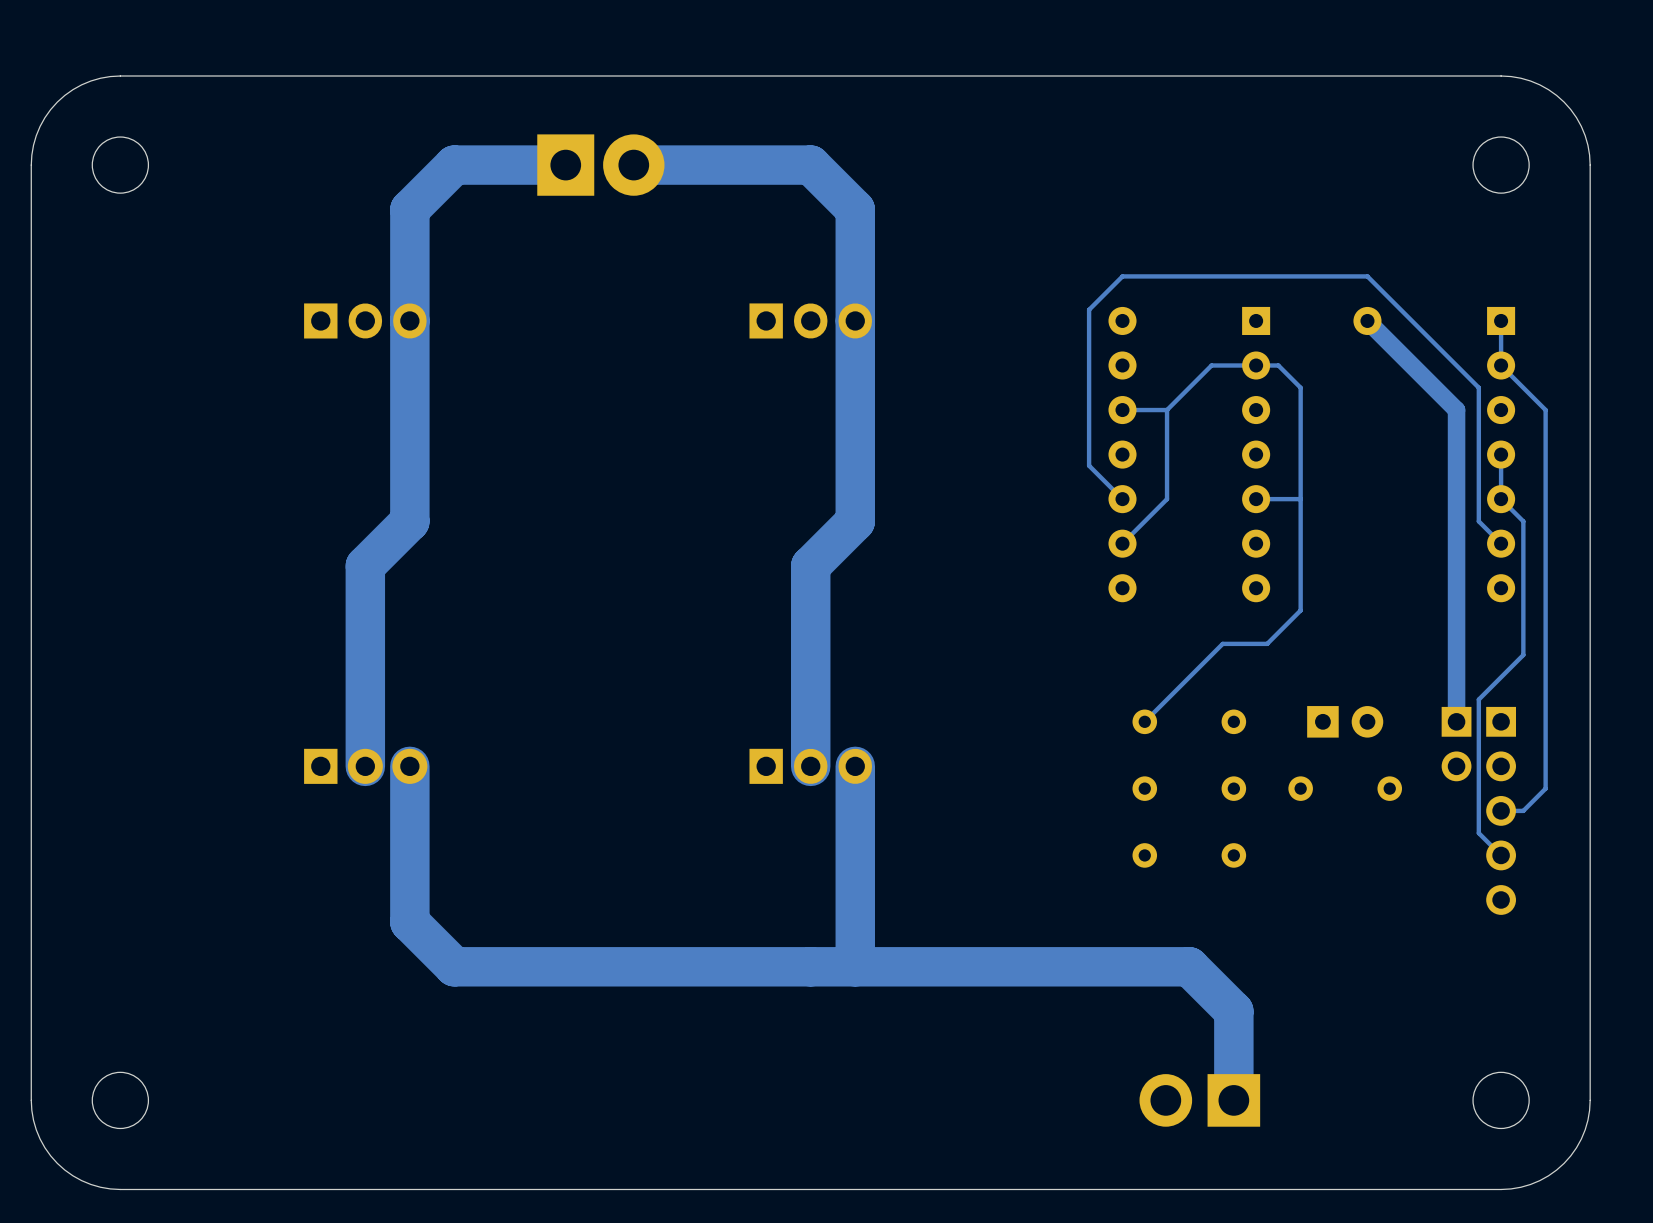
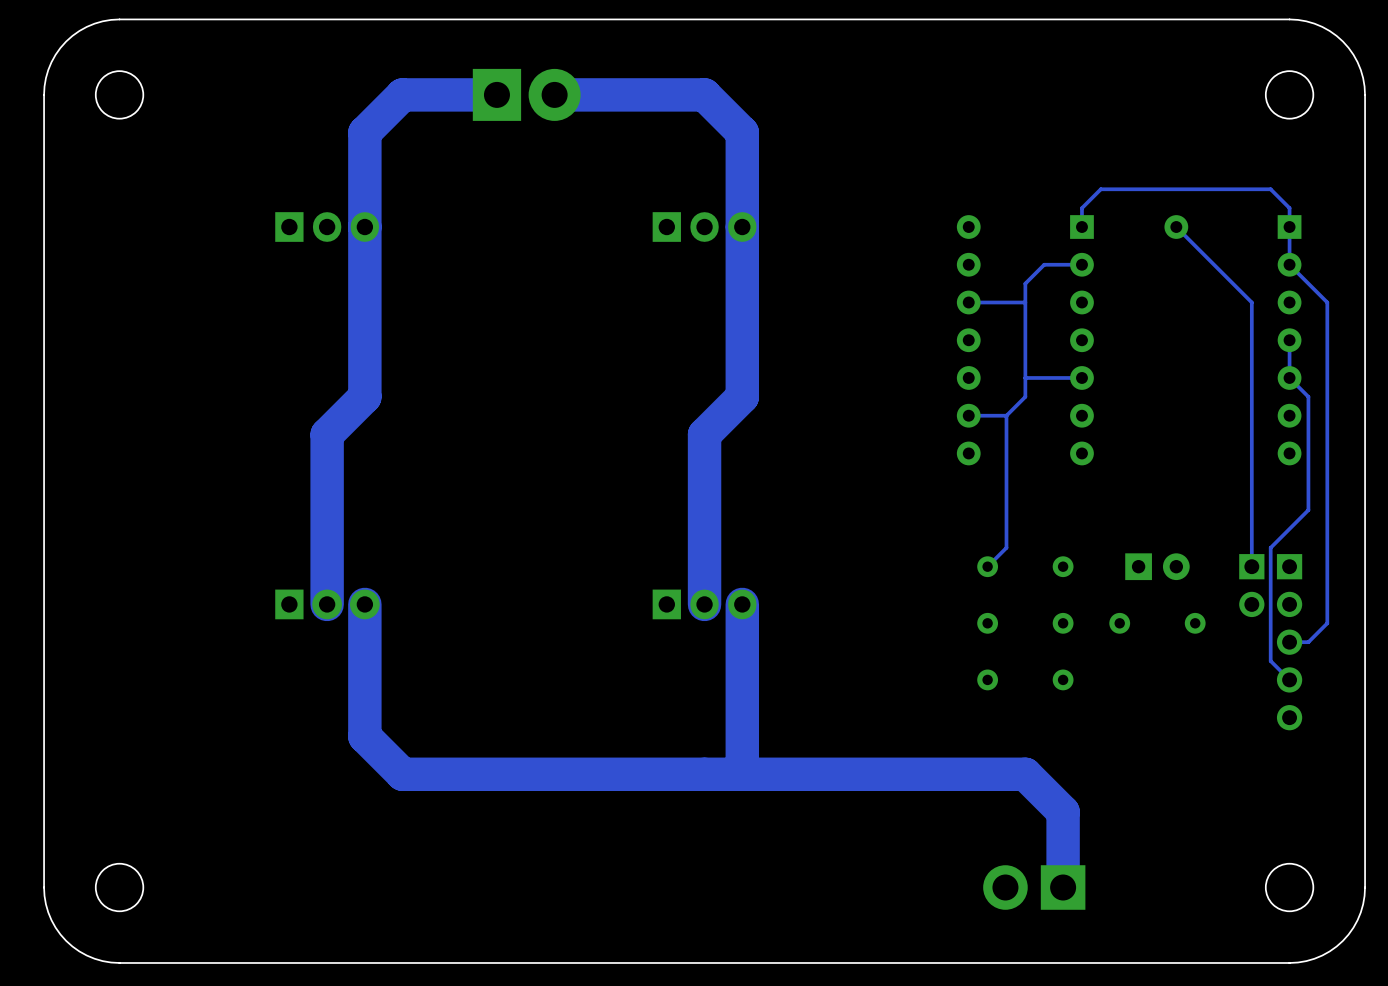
track: (1278, 276) (1122, 276) (1089, 309) (1089, 465) (1122, 499) -> (1100, 189) (1081, 208) (1081, 227)
track: (1367, 276) (1478, 387) (1478, 521) (1501, 543) -> (1176, 189) (1270, 189) (1289, 208) (1289, 227)
track width: thick (1367, 320) (1456, 410) (1456, 721) -> thin (1176, 227) (1251, 302) (1251, 566)
track: (1256, 365) (1278, 365) (1300, 387) (1300, 610) (1267, 643) (1222, 643) (1167, 699) -> (1006, 415) (1006, 547)
track: (1189, 387) (1167, 410) (1167, 499) (1122, 543) -> (1025, 283) (1025, 396) (1006, 415)
track: none -> (1025, 302) (1006, 302)
track: (1300, 499) (1256, 499) -> (1025, 377) (1081, 377)
track: none -> (1006, 415) (968, 415)

